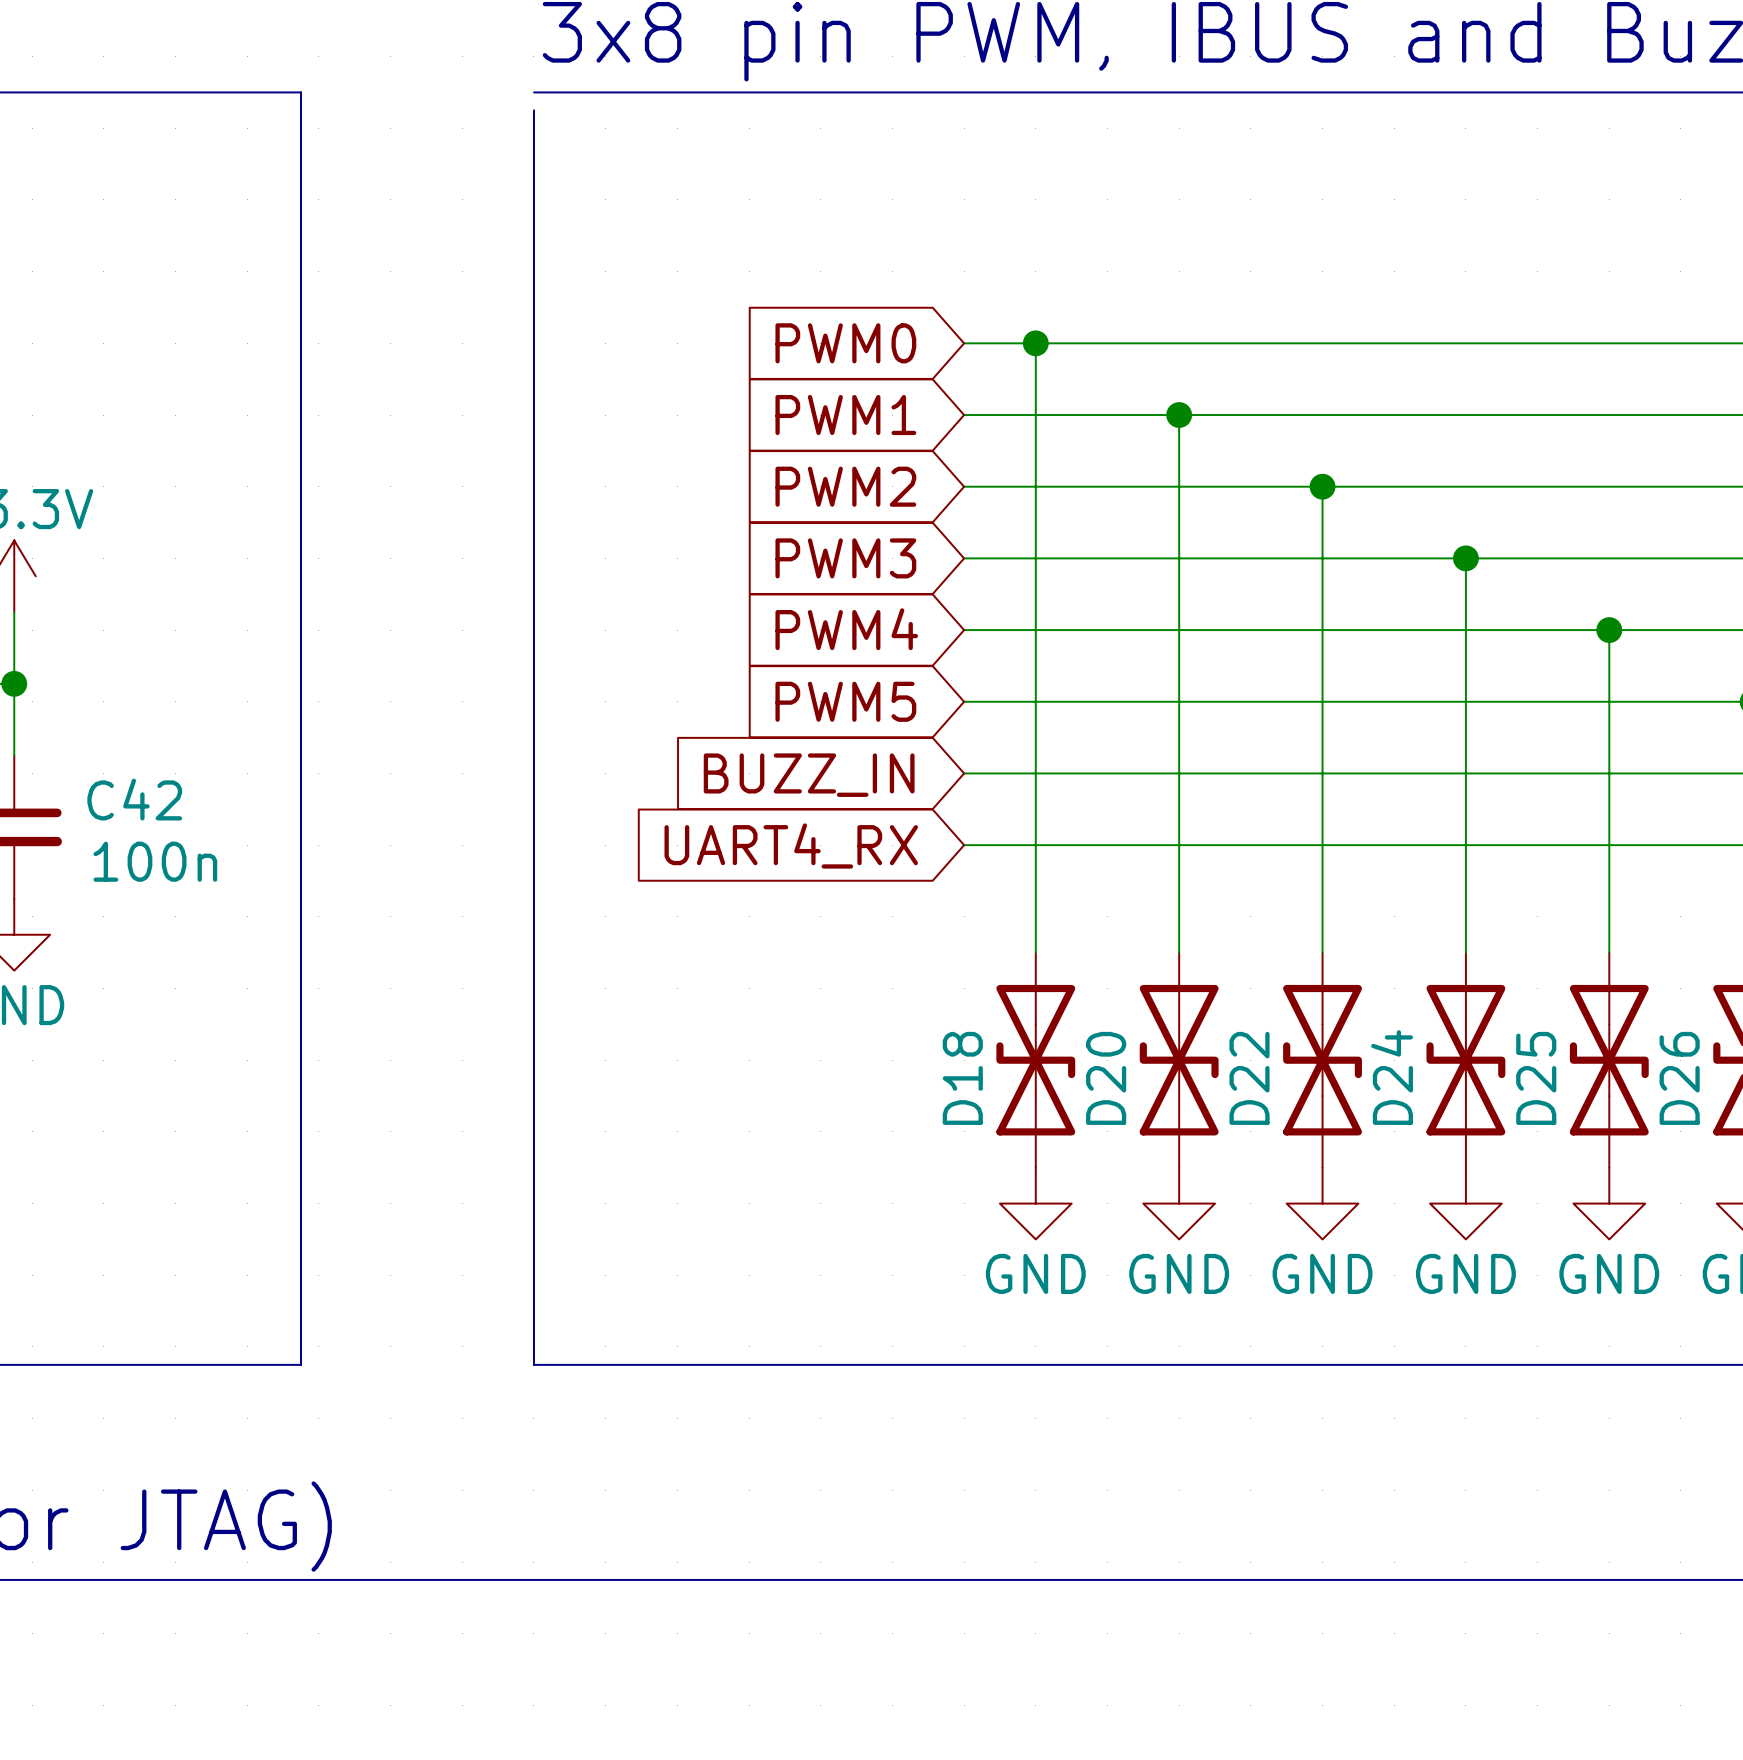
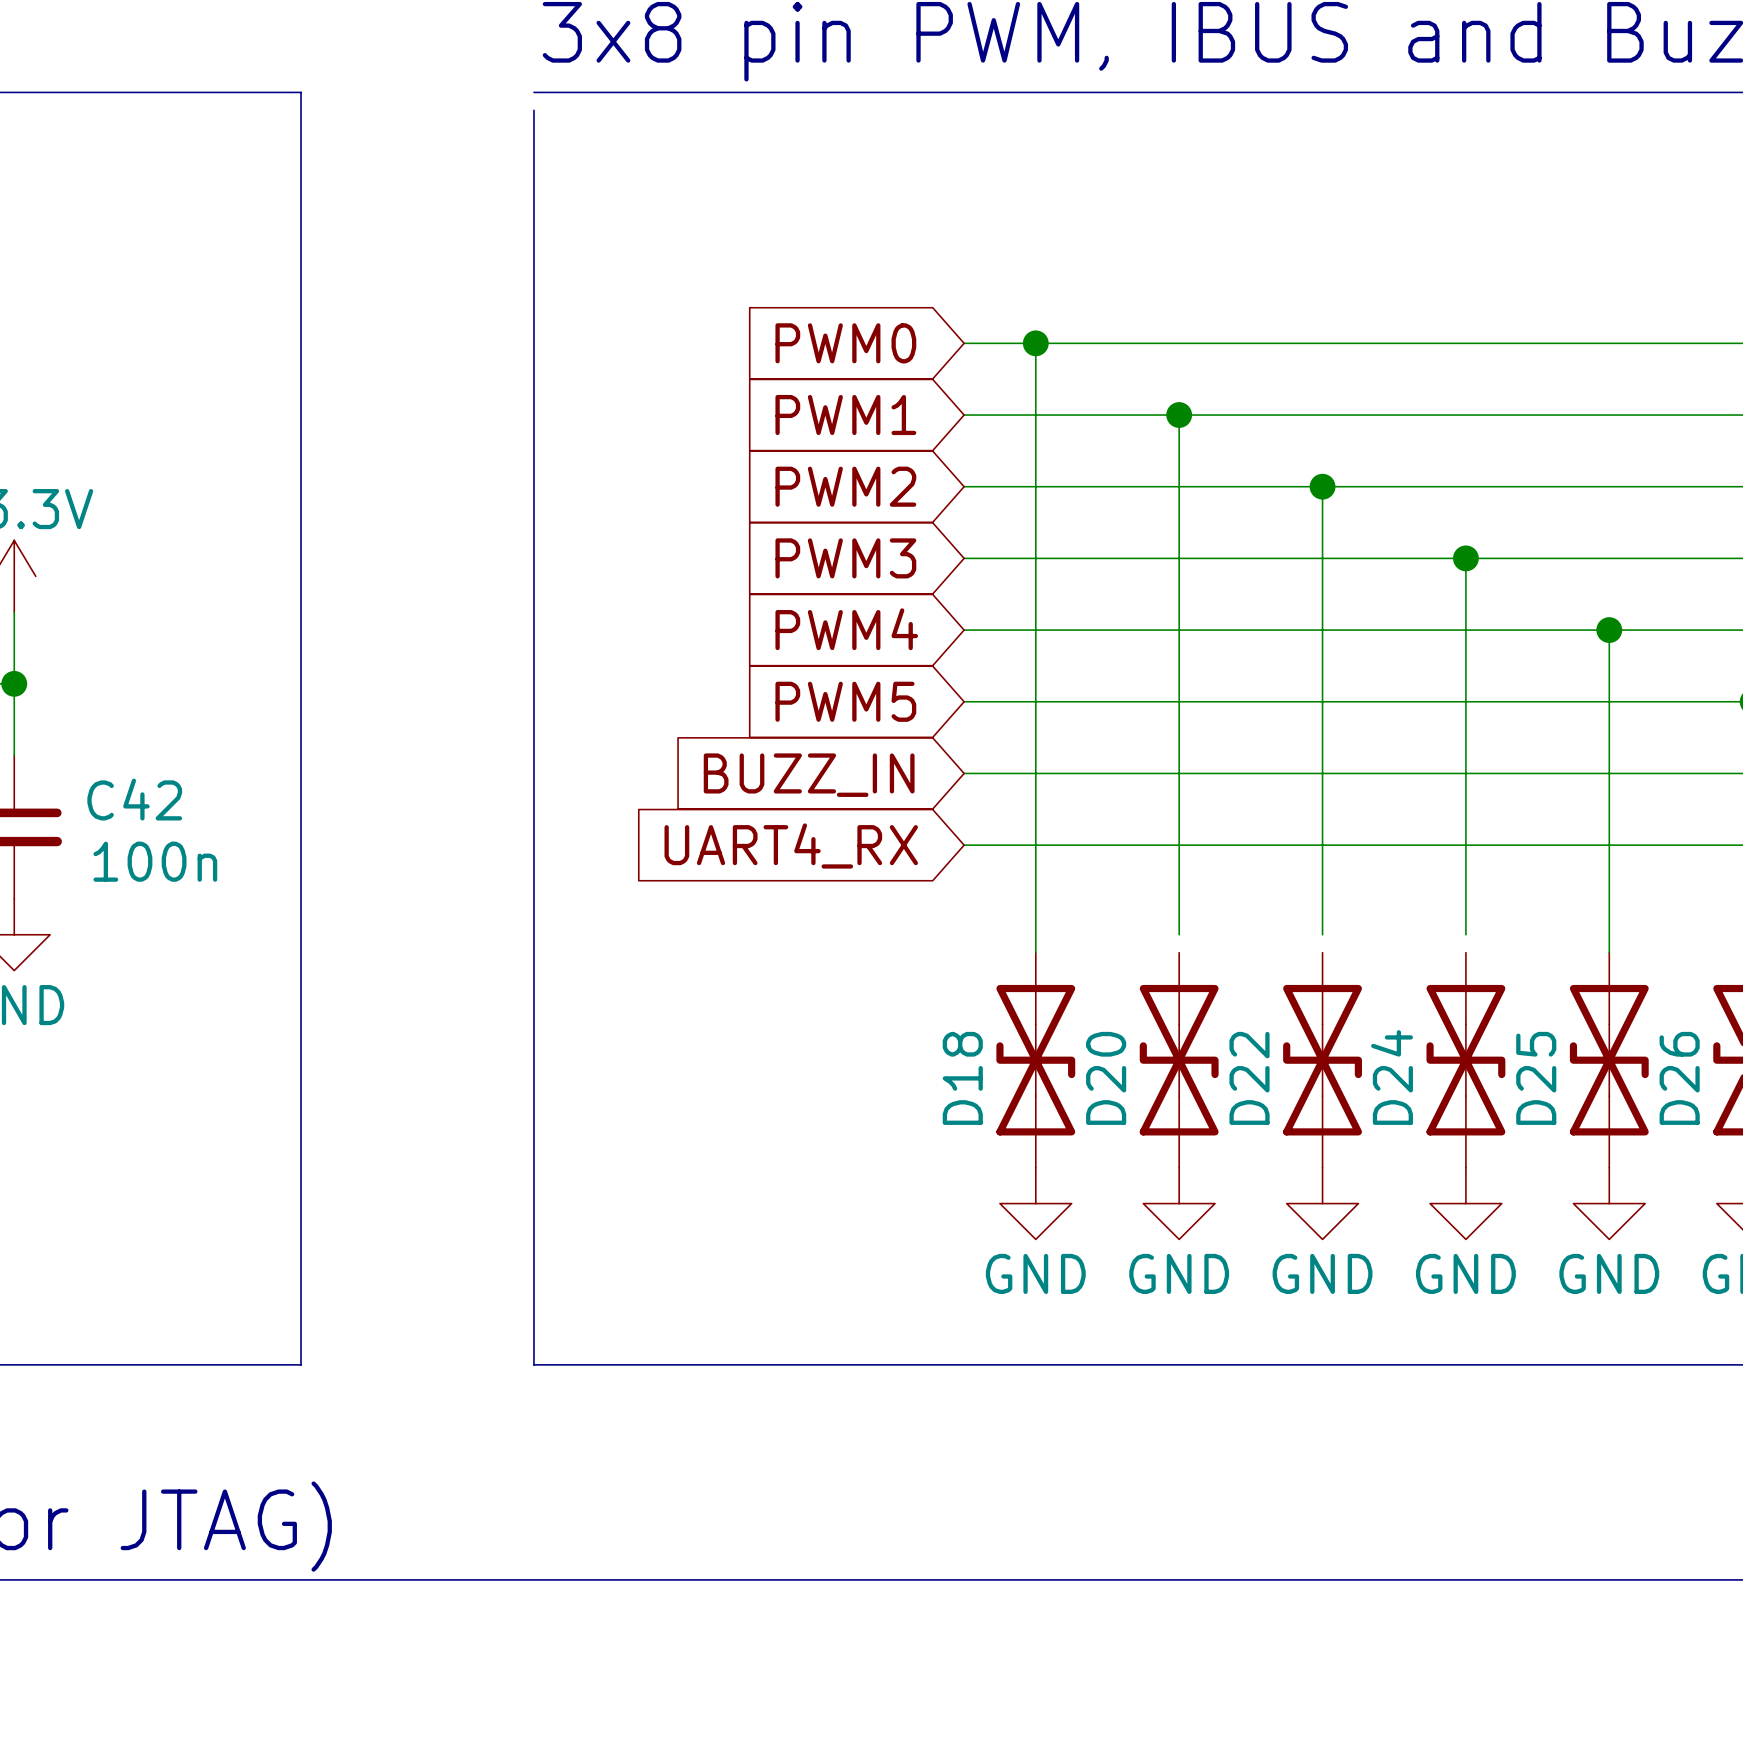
wire: (1179, 934) (1179, 952) -> none
wire: (1322, 934) (1322, 952) -> none
wire: (1465, 934) (1465, 952) -> none

